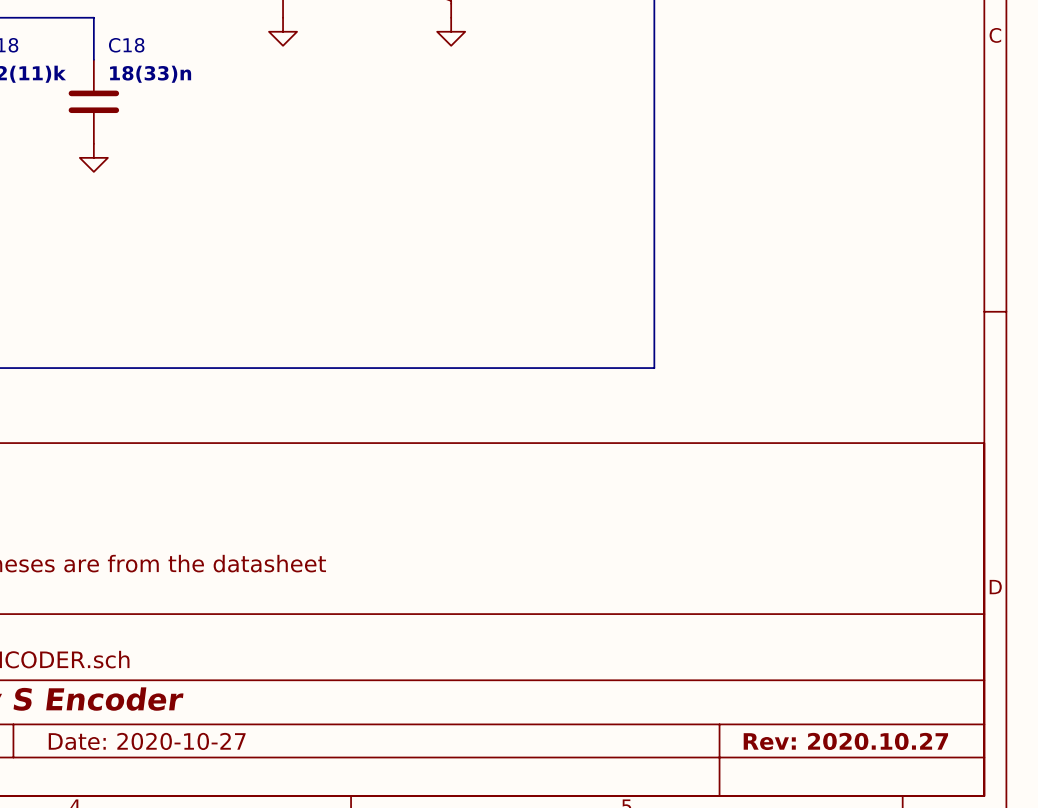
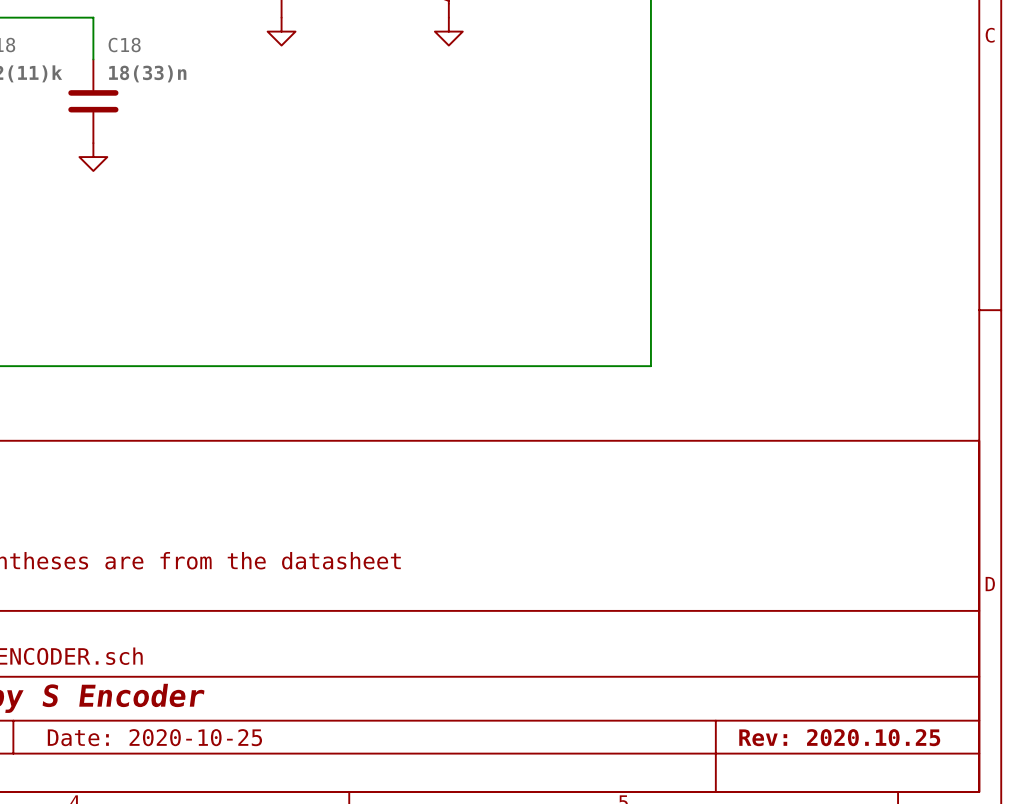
title block: Date: 2020-10-27 (147, 741) -> Date: 2020-10-25 (154, 737)
title block: Rev: 2020.10.27 (845, 741) -> Rev: 2020.10.25 (839, 737)

